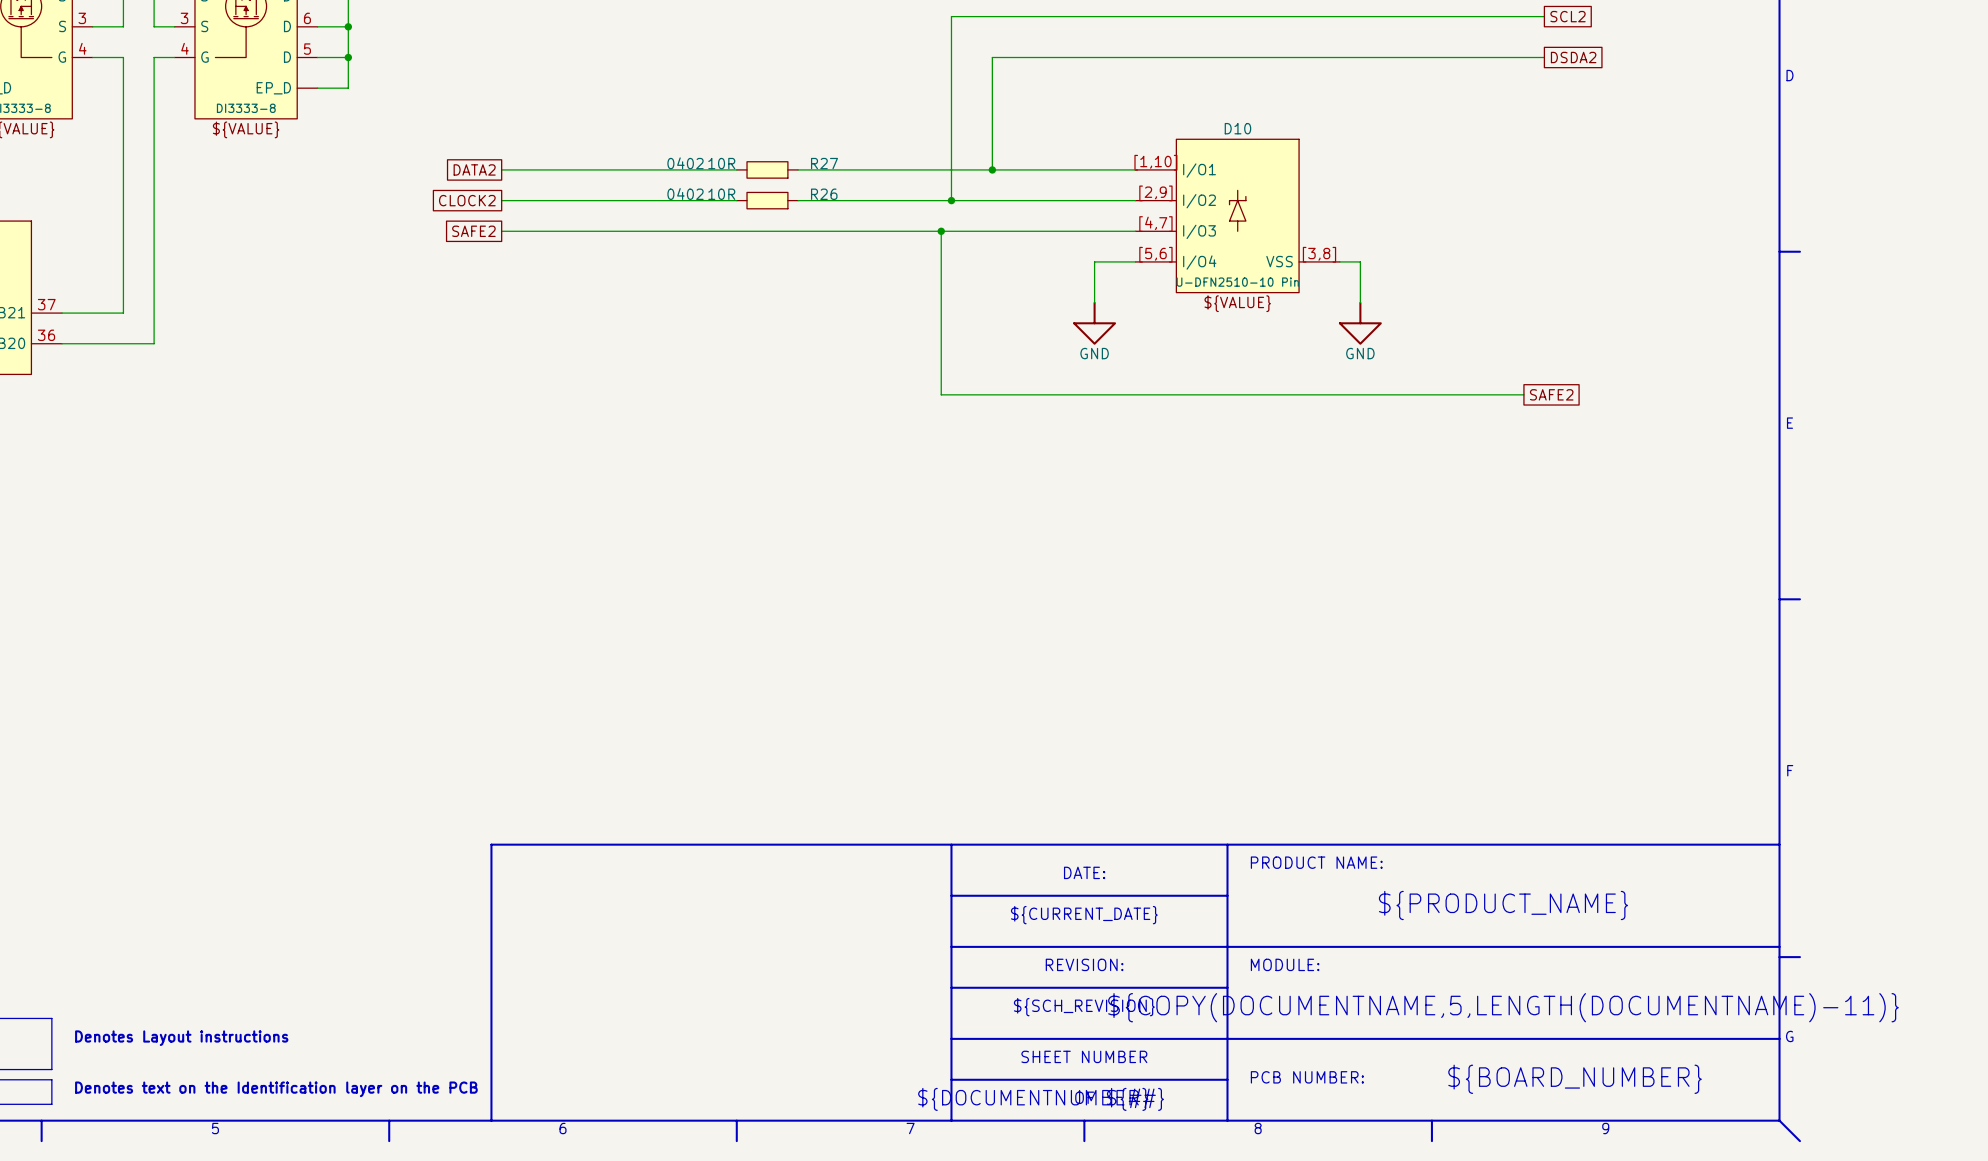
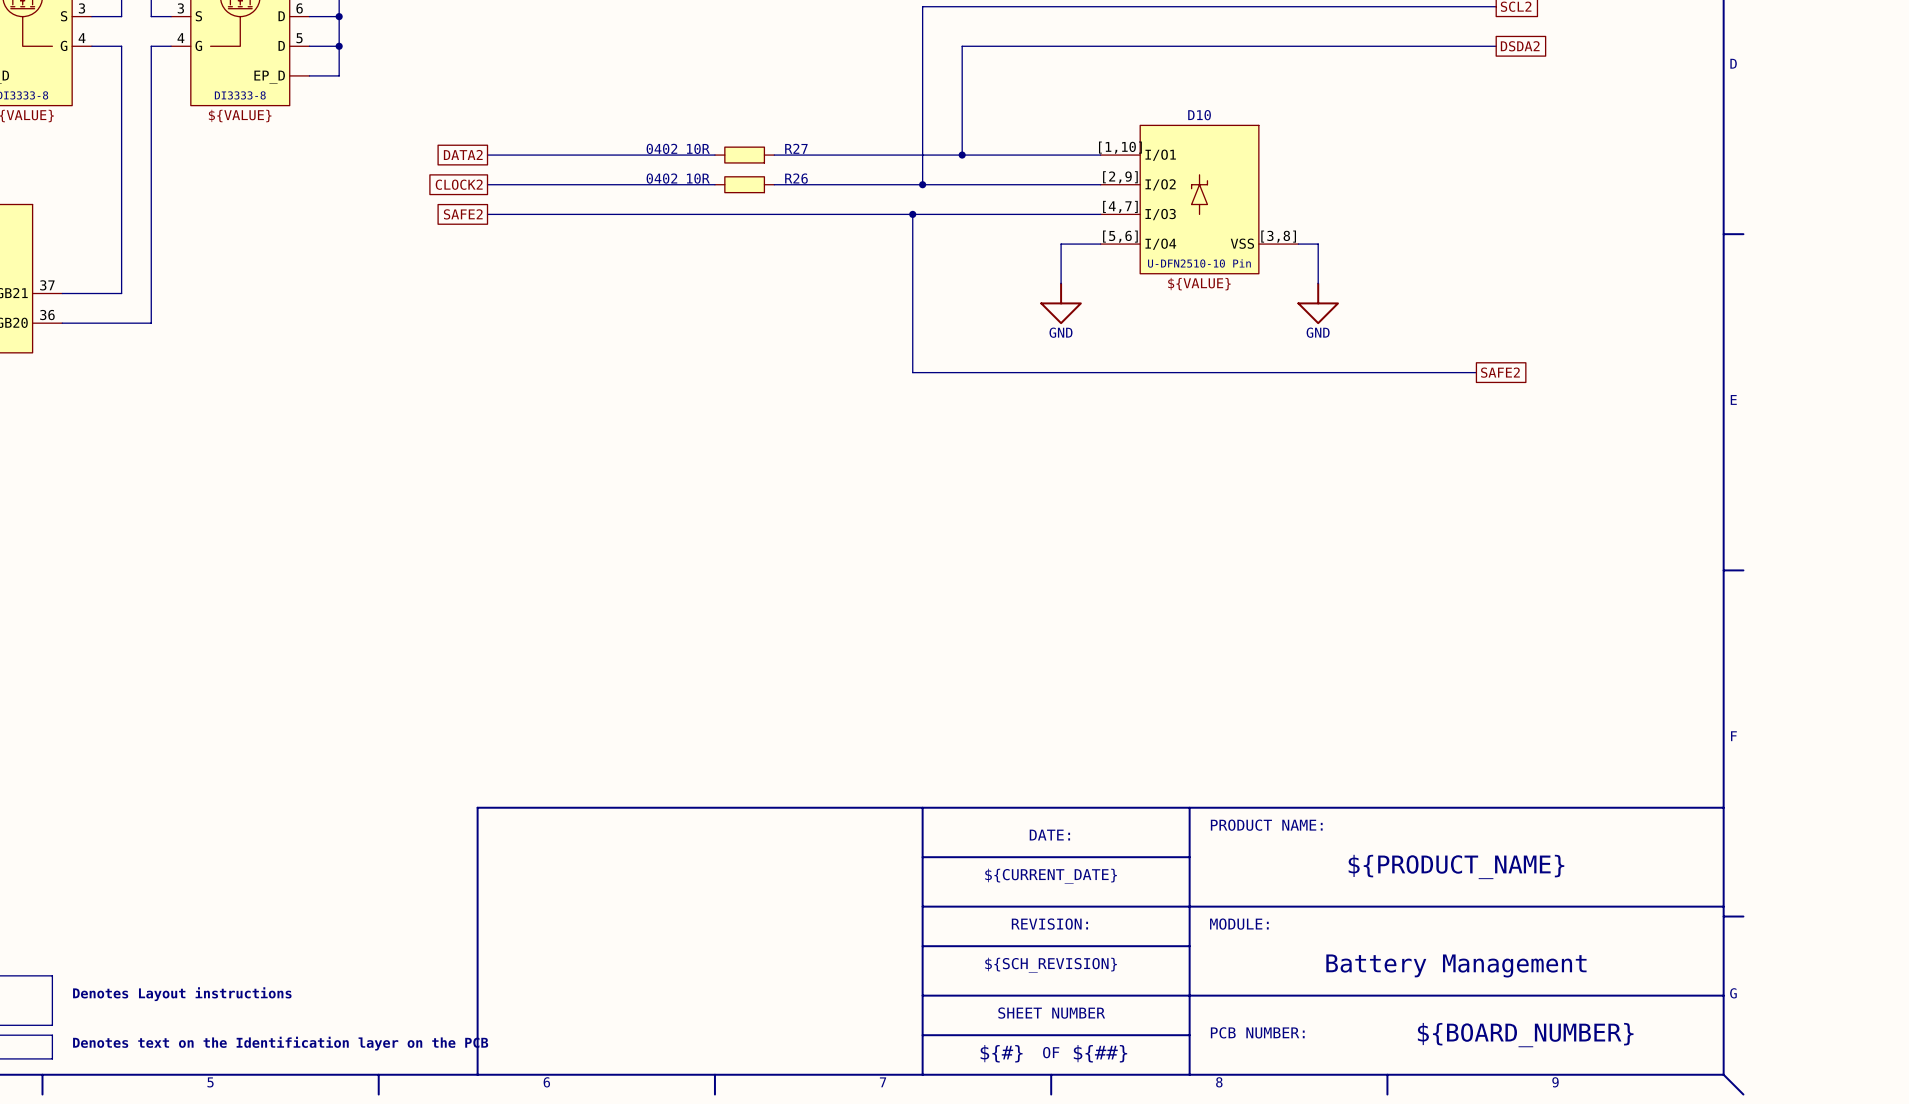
text: ${COPY(DOCUMENTNAME,5,LENGTH(DOCUMENTNAME)-11)} (1503, 1007) -> Battery Management (1456, 965)
text: ${DOCUMENTNUMBER} (1033, 1099) -> ${#} (1001, 1053)

